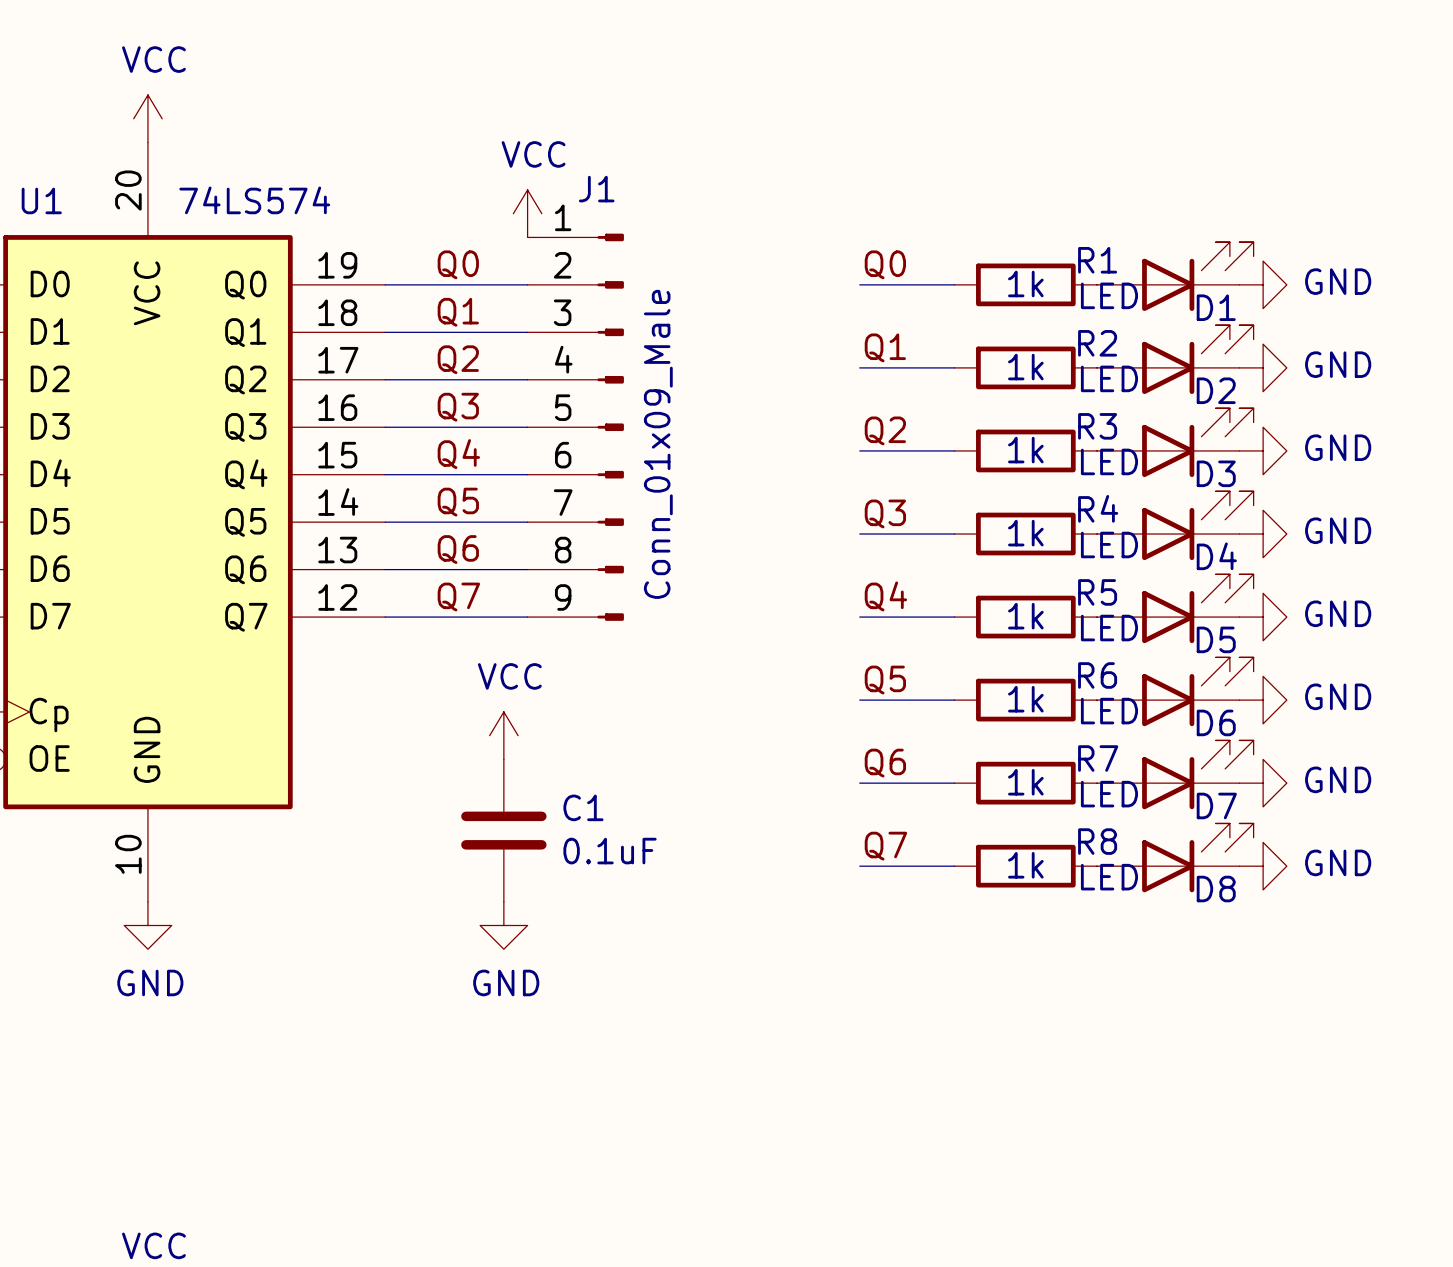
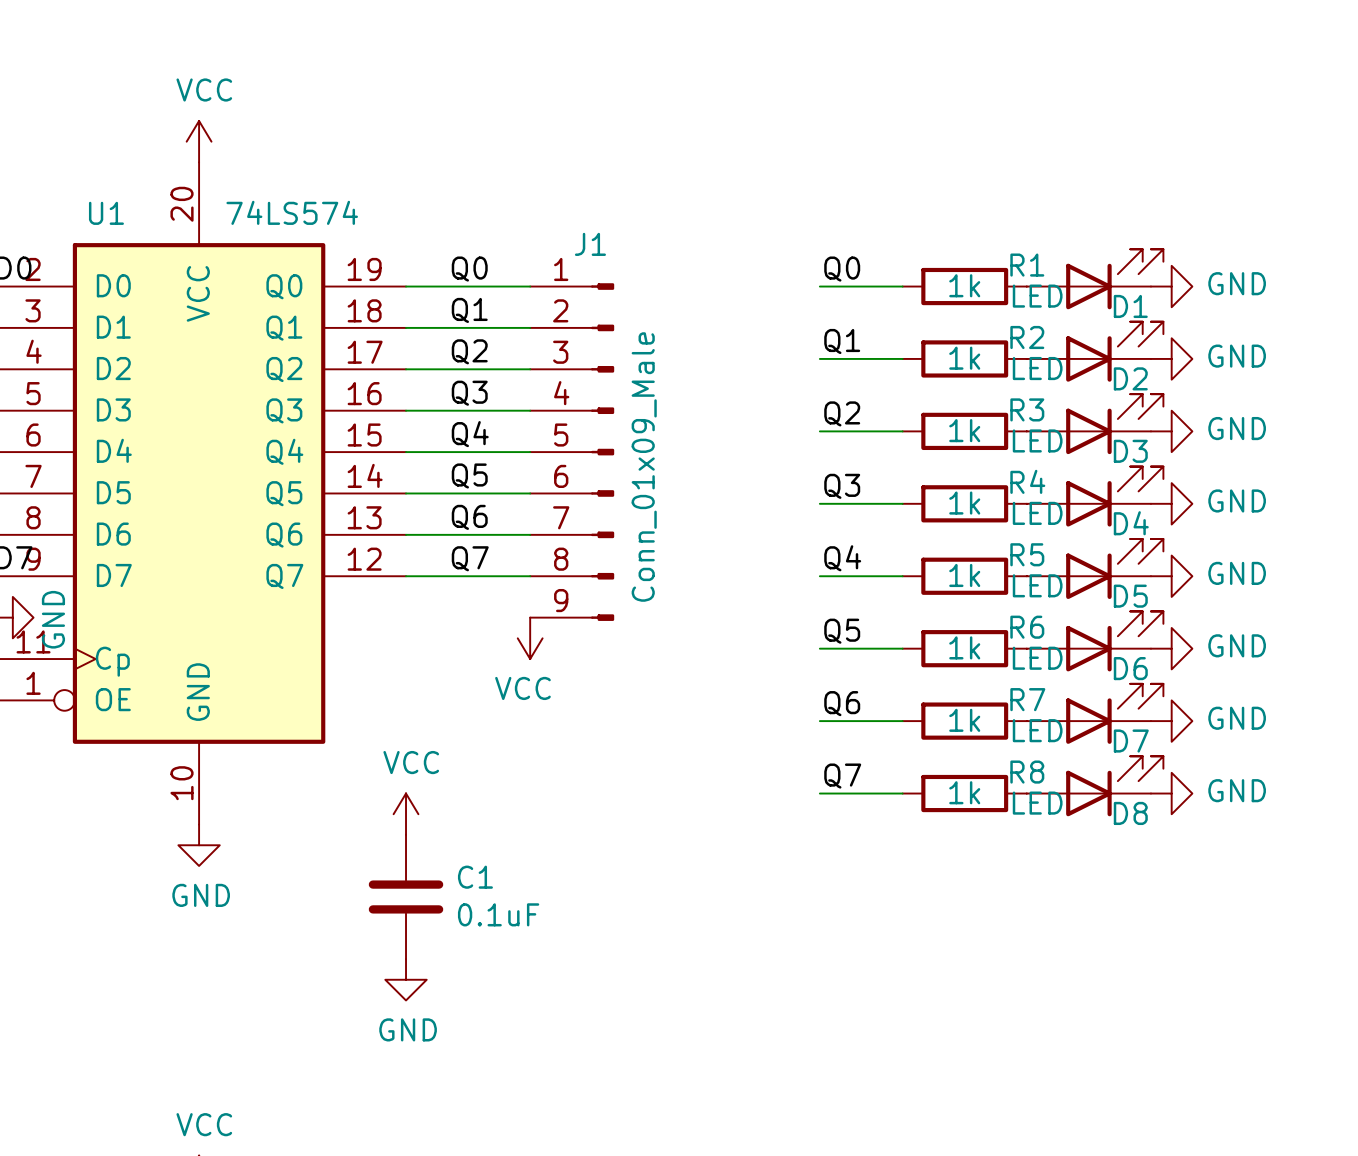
power symbol: VCC (527, 213) -> none
J1 position: (575, 427) -> (572, 452)
power symbol rotation: 0° (503, 735) -> 180° (530, 638)
power symbol position: VCC (503, 735) -> VCC (530, 638)
C1 position: (503, 830) -> (406, 896)
power symbol: none -> VCC (406, 814)
power symbol position: GND (503, 925) -> GND (406, 979)

